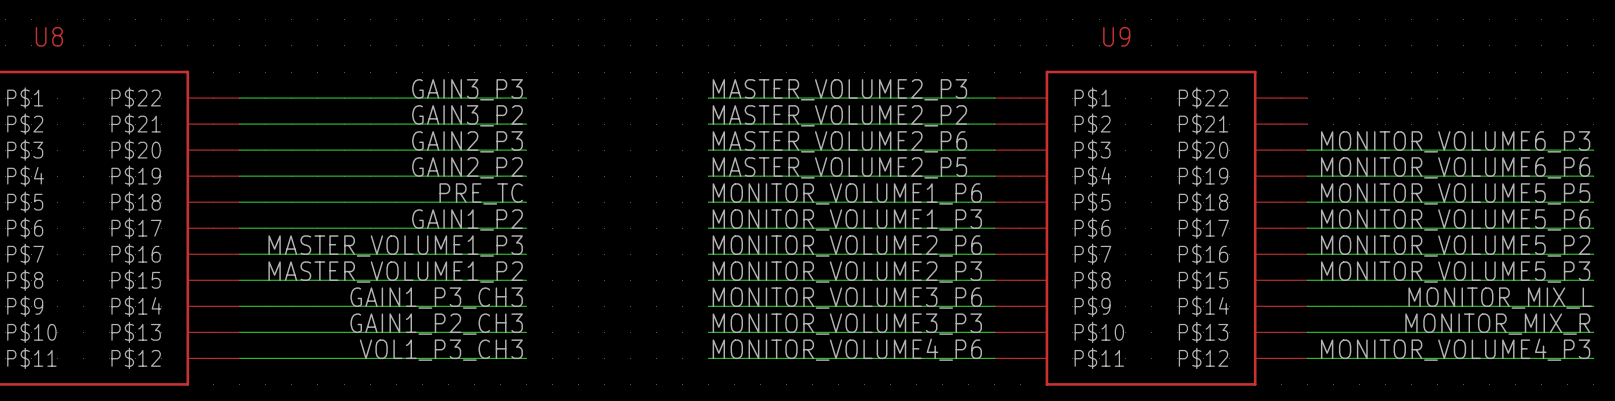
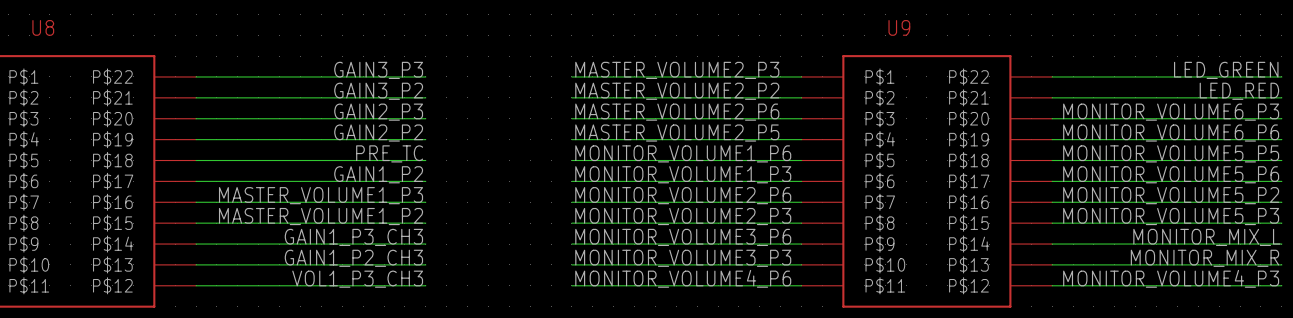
label: none -> LED_GREEN (1226, 70)
wire: none -> (1052, 76) (1281, 76)
label: none -> LED_RED (1239, 91)
wire: none -> (1052, 97) (1281, 97)

